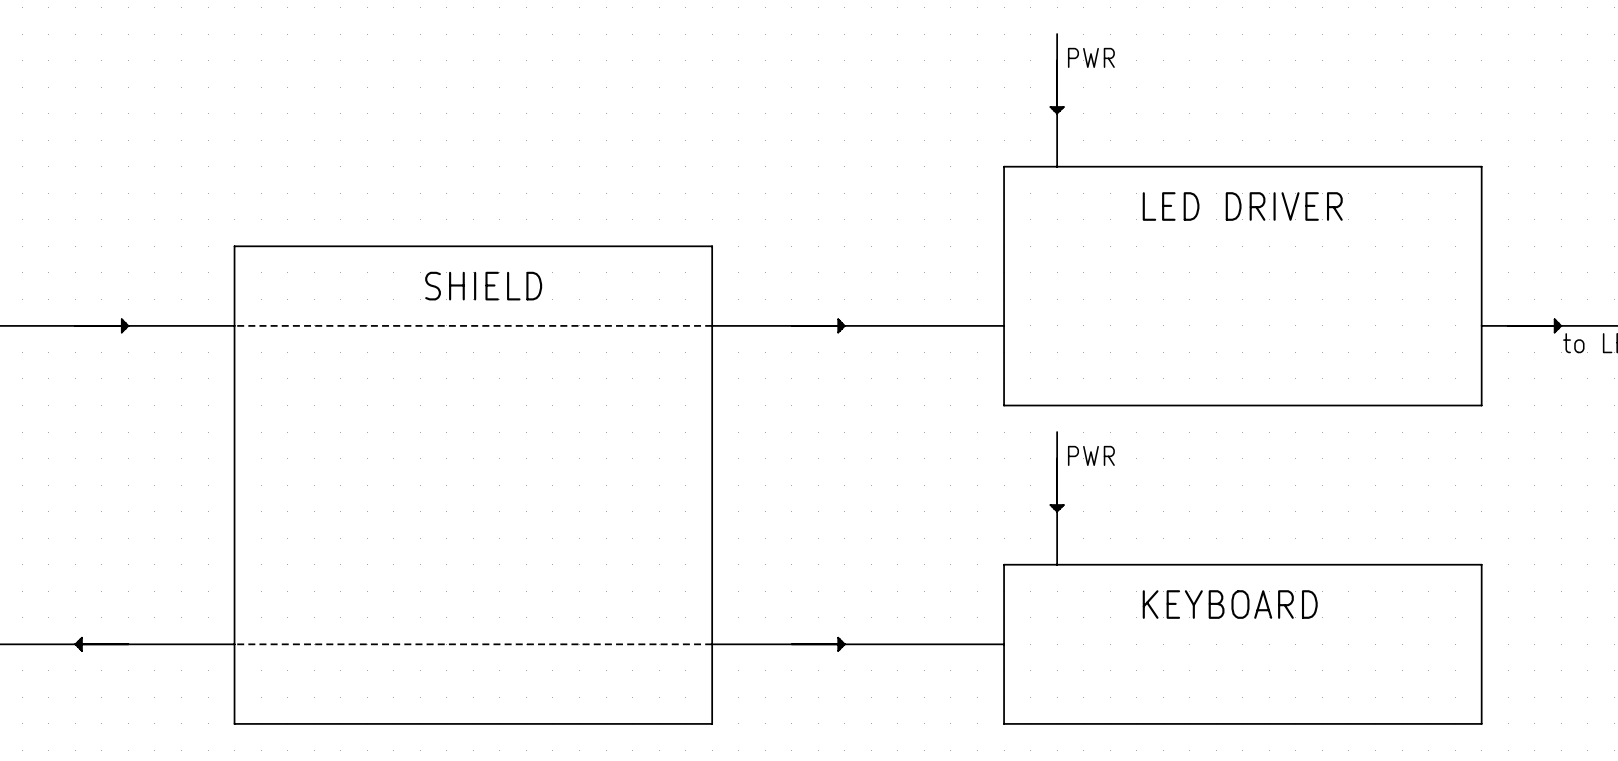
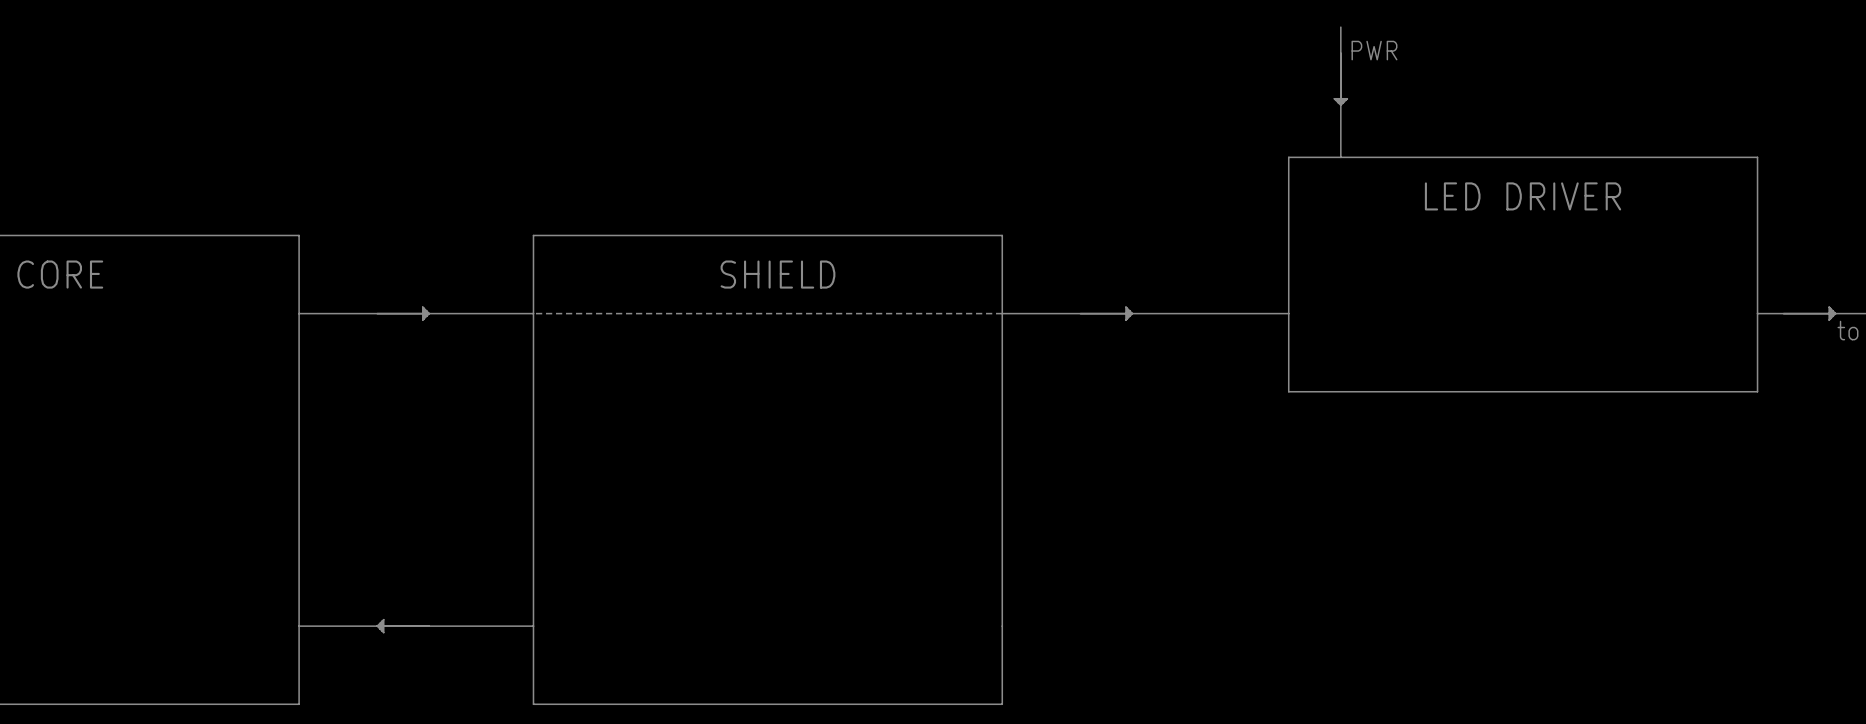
line: (1057, 432) (1057, 564) -> none
text: PWR (1091, 455) -> none
part: (1057, 485) -> none
line: (1004, 564) (1481, 564) (1481, 723) (1004, 723) (1004, 564) -> none
text: KEYBOARD (1230, 604) -> none
line: (234, 644) (1004, 644) -> none
part: (818, 644) -> none

